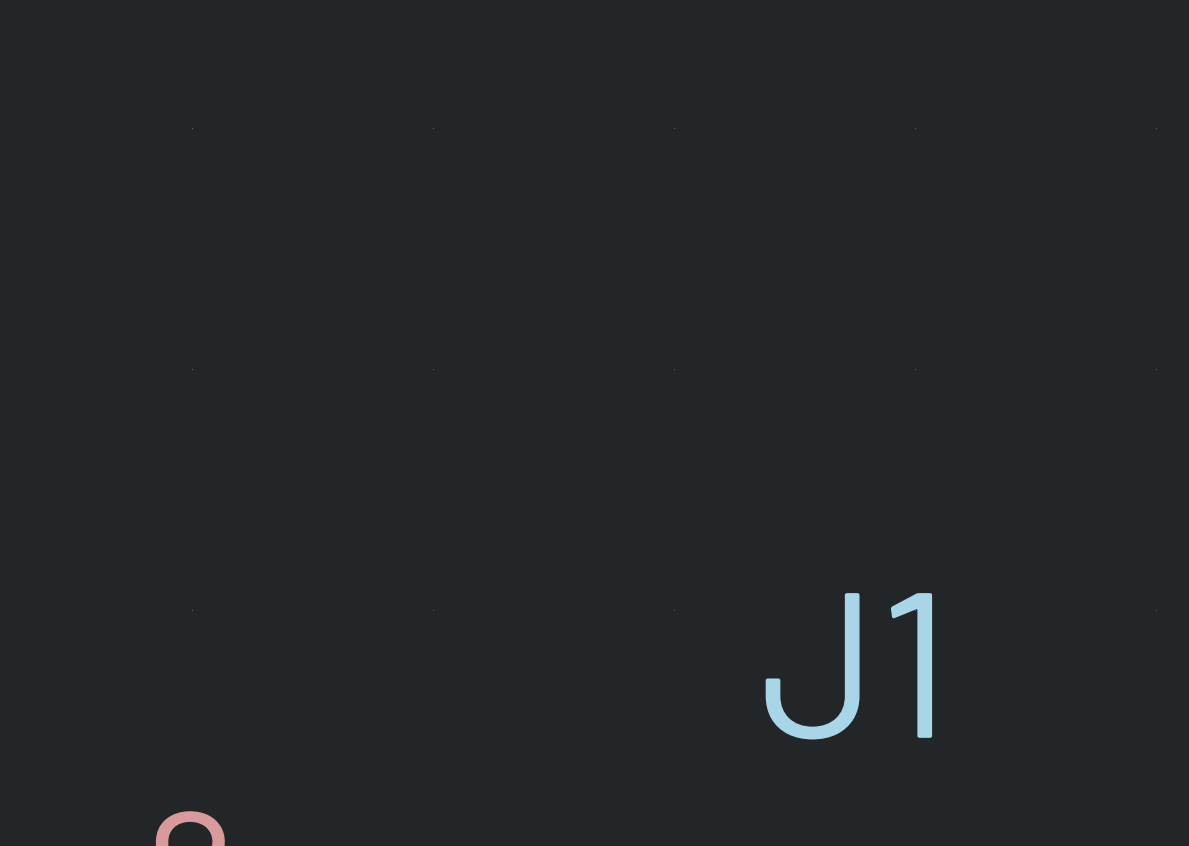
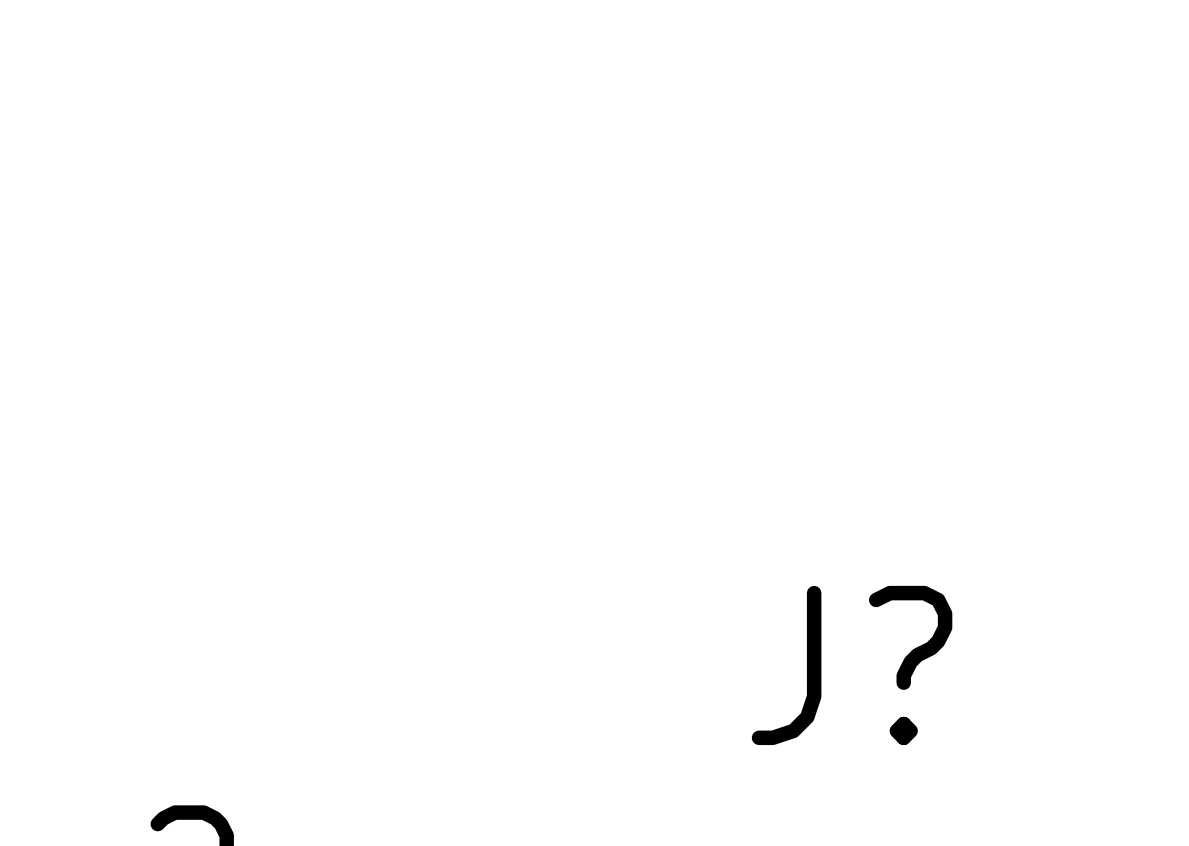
J1 name: J1 (848, 666) -> J? (852, 665)

